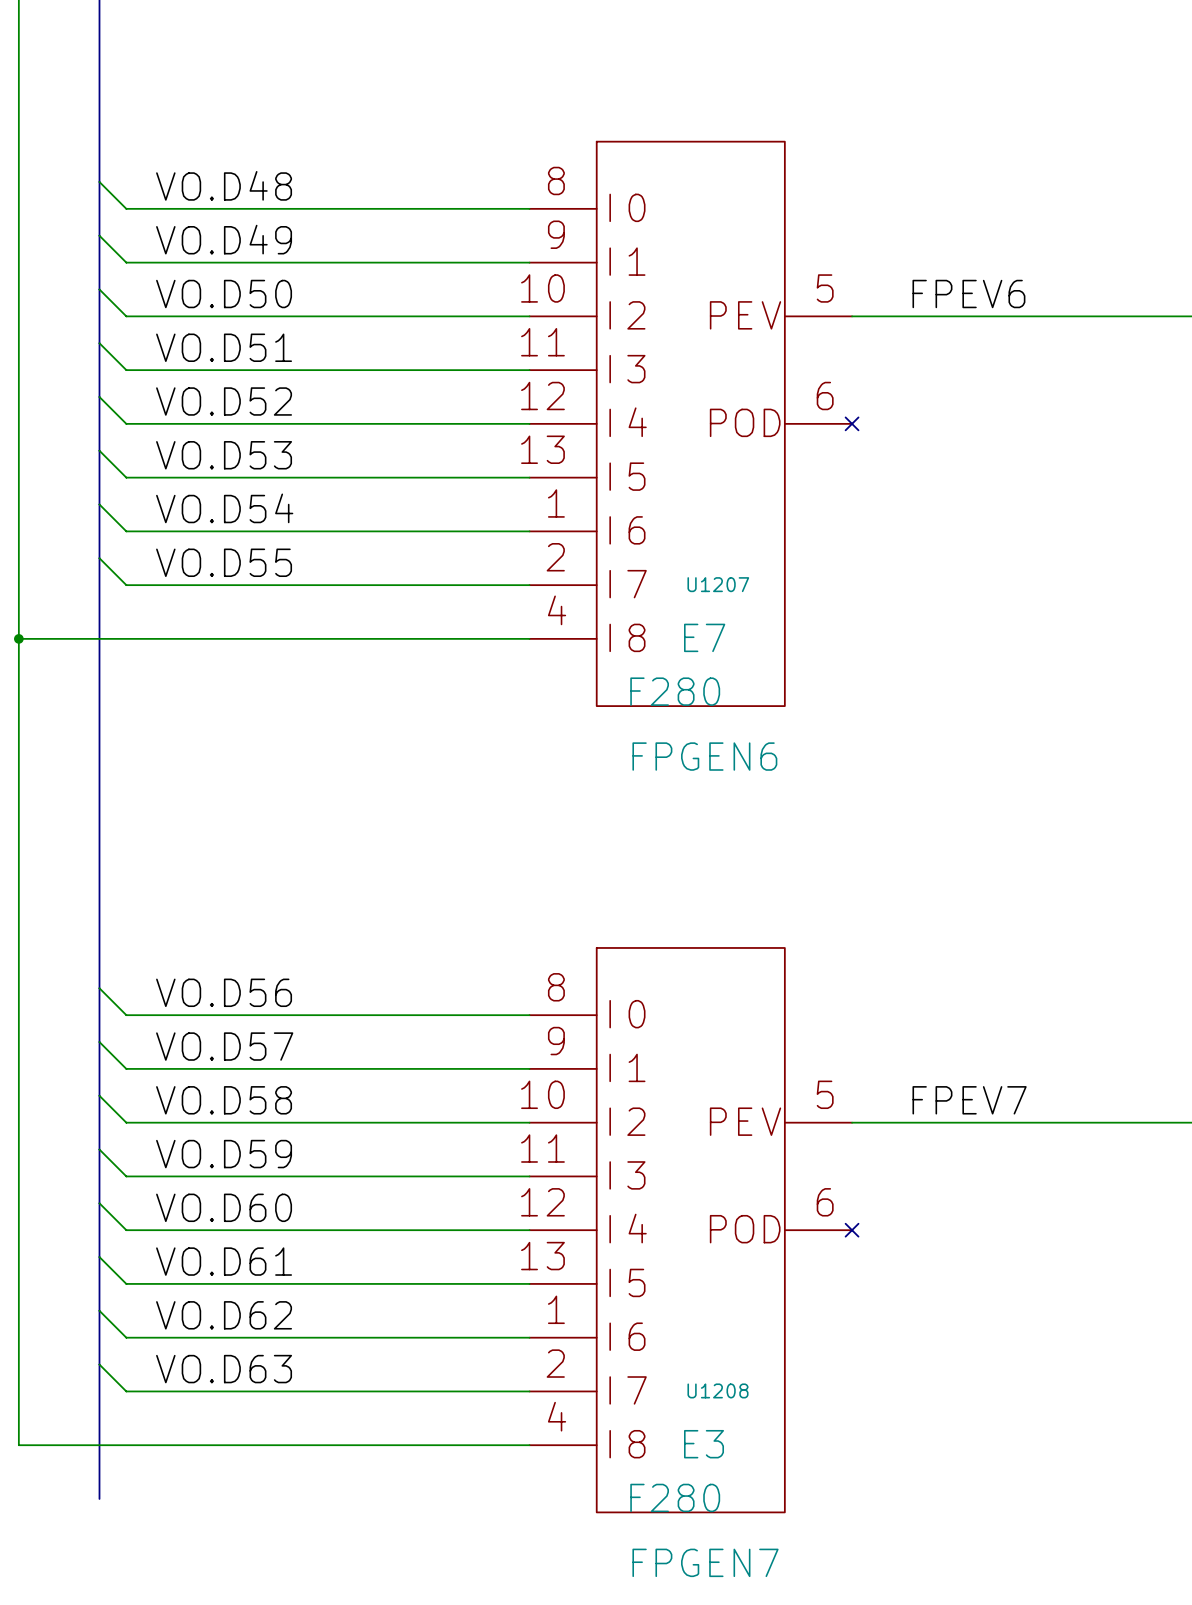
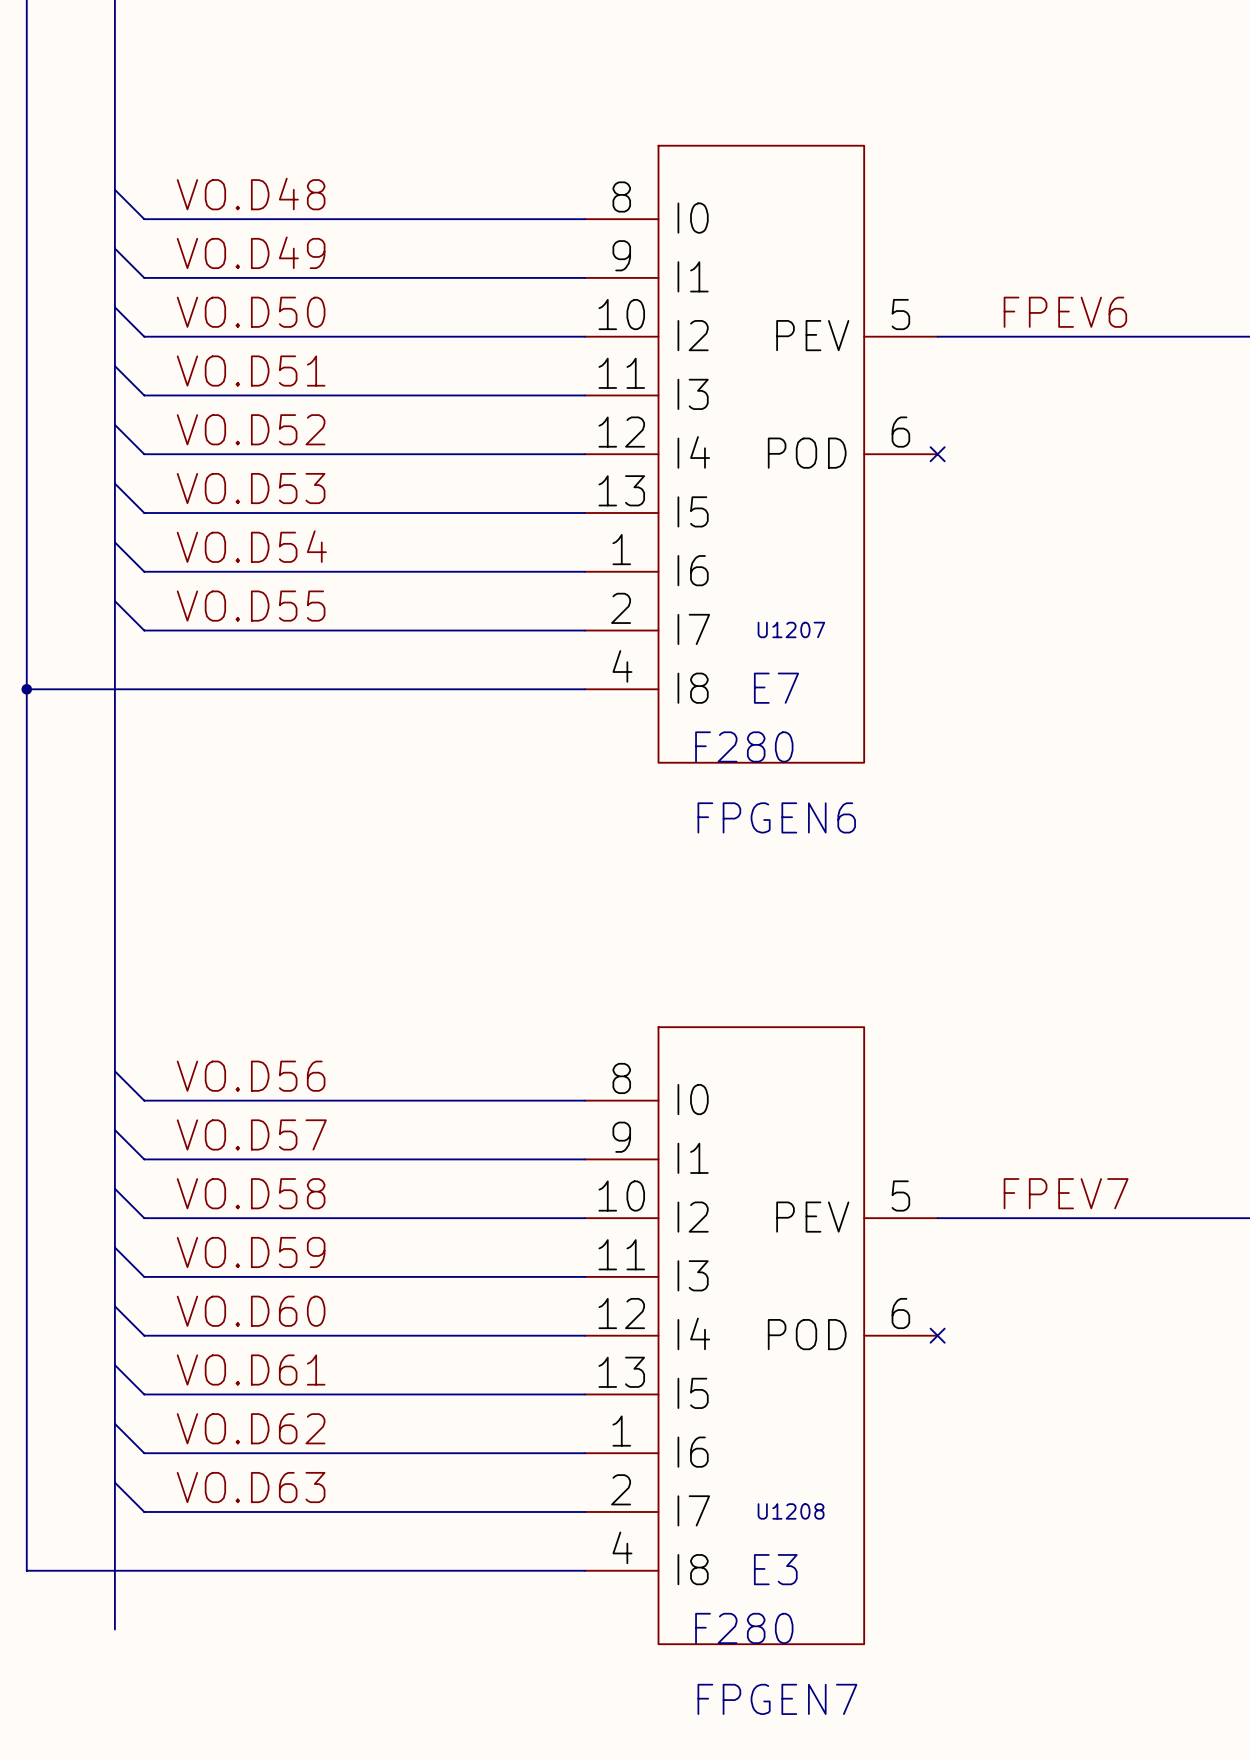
U1207 symbol: [529, 141, 853, 707] -> [585, 145, 938, 763]
U1208 symbol: [529, 947, 853, 1513] -> [585, 1027, 938, 1645]

